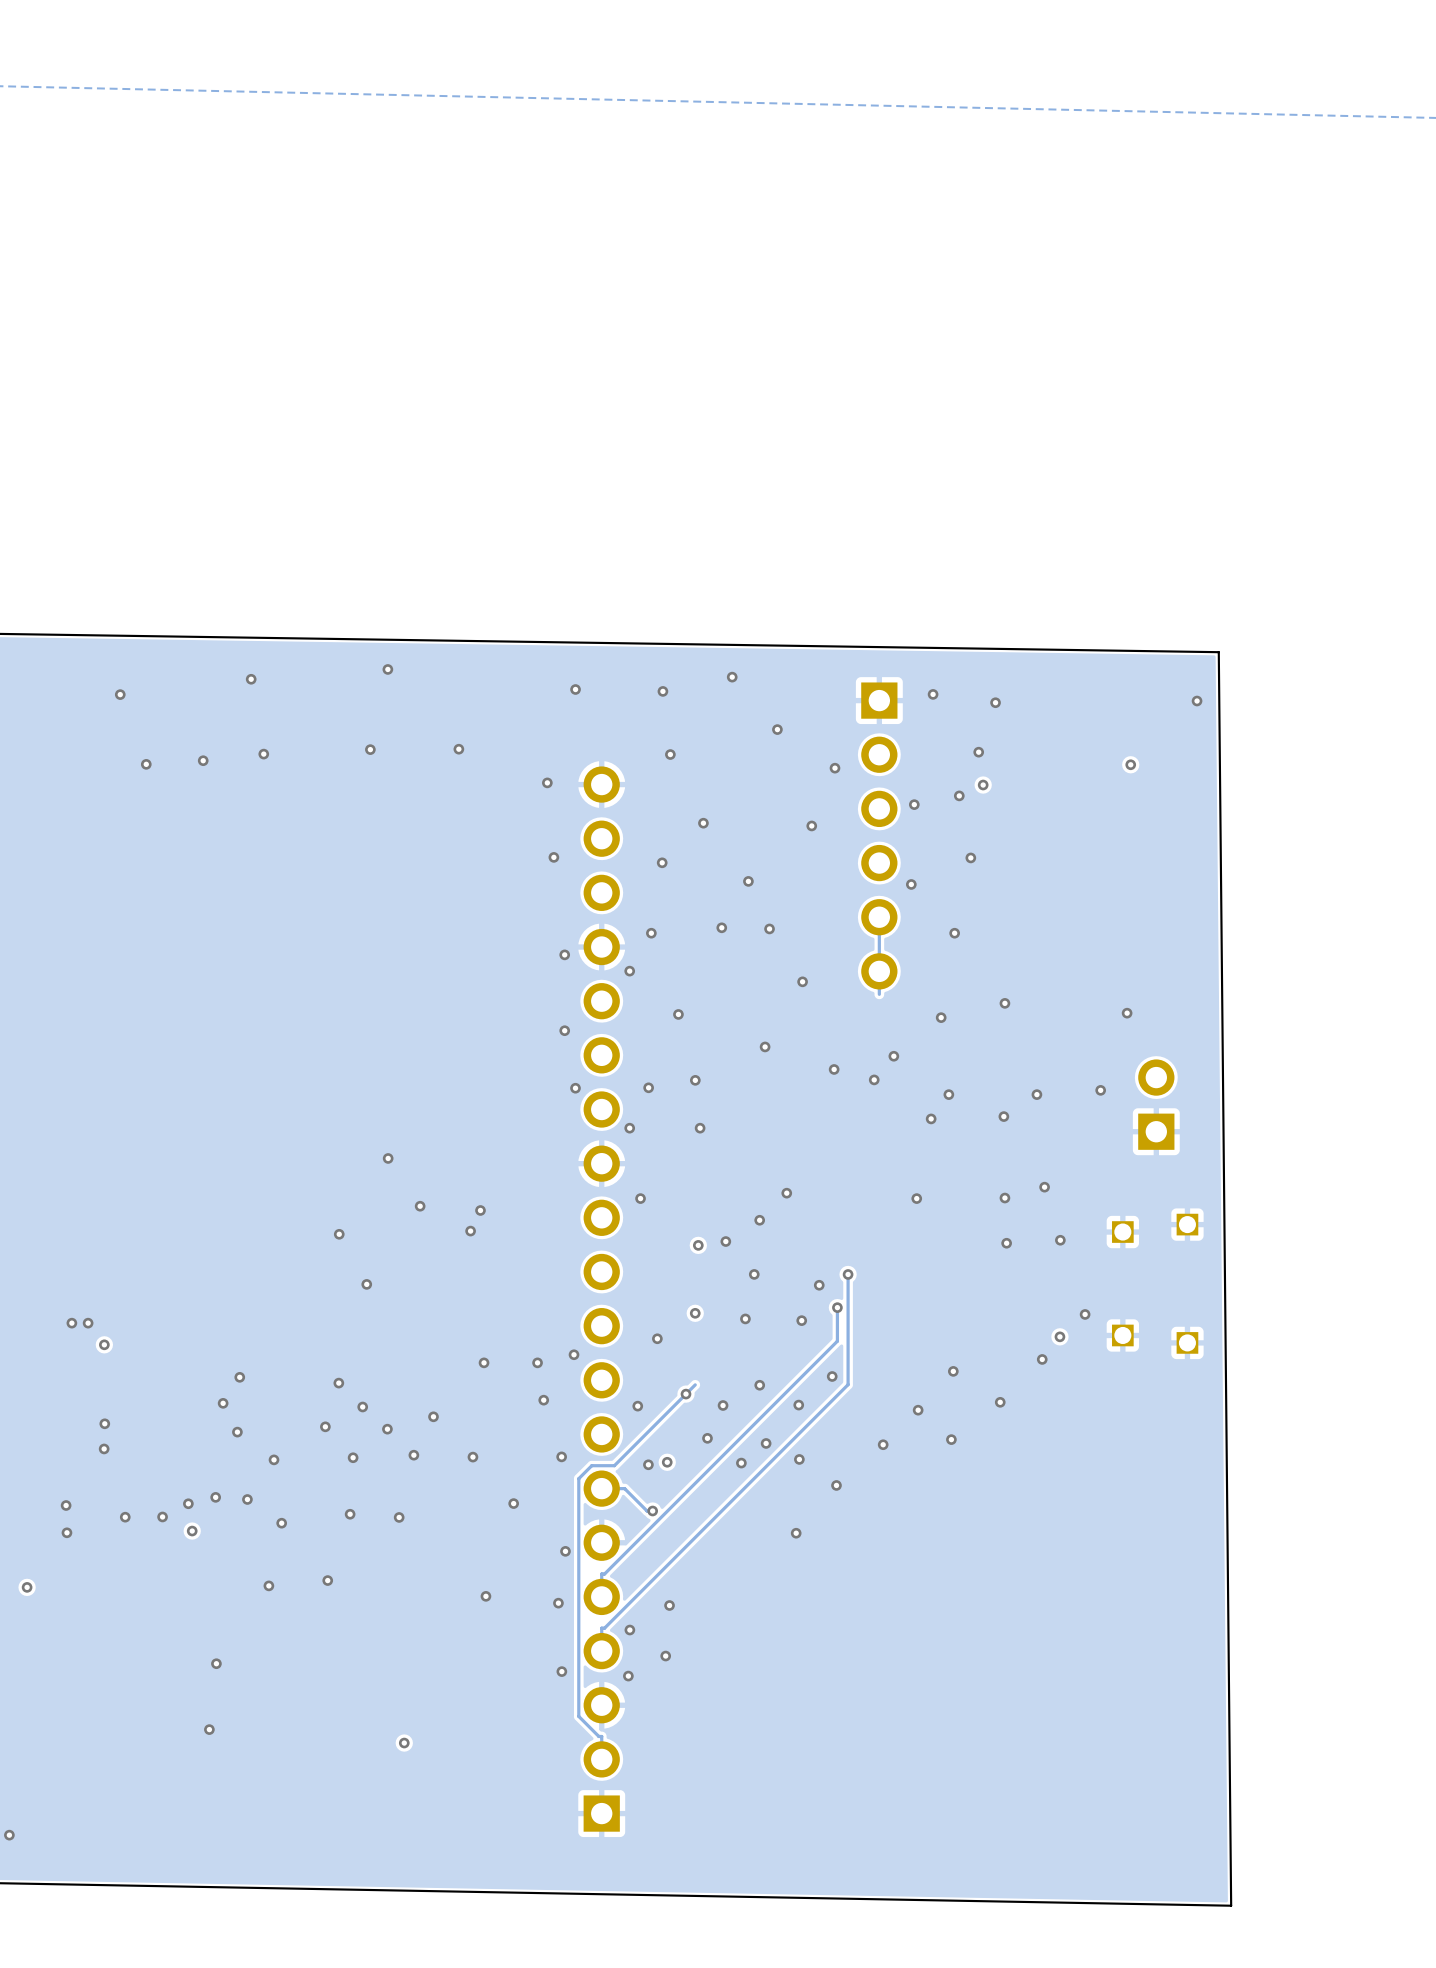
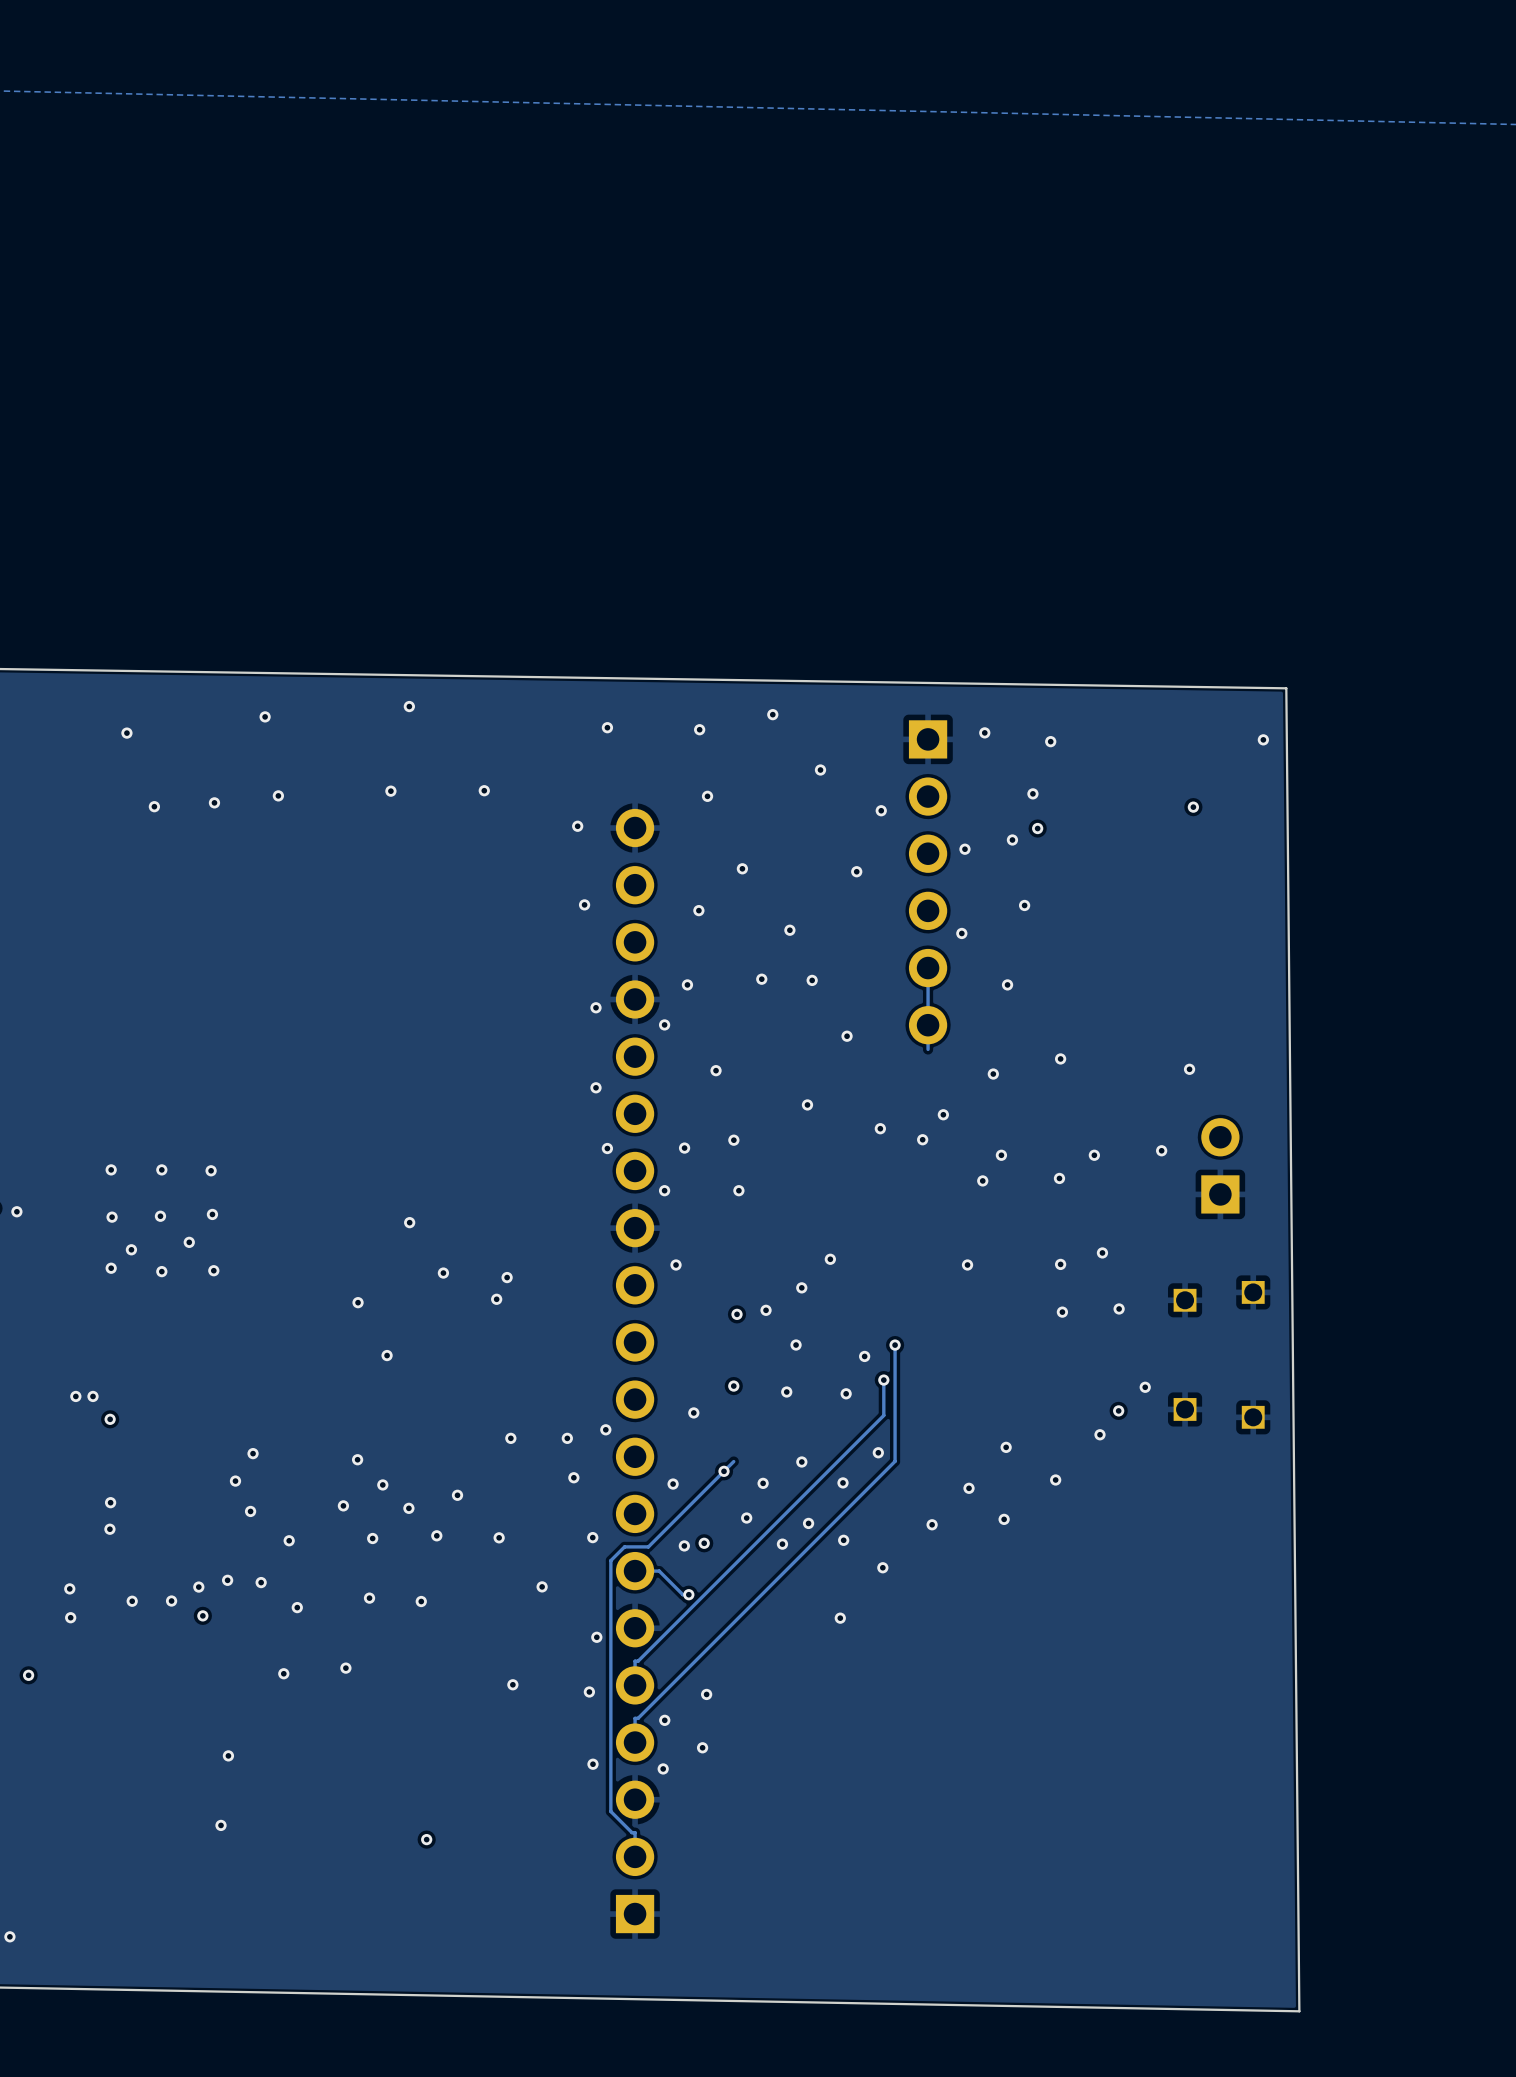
via: none -> (111, 1169)
via: none -> (161, 1169)
via: none -> (211, 1170)
via: none -> (16, 1211)
via: none -> (212, 1214)
via: none -> (160, 1216)
via: none -> (112, 1217)
via: none -> (189, 1242)
via: none -> (131, 1249)
via: none -> (111, 1268)
via: none -> (161, 1271)
via: none -> (213, 1270)

